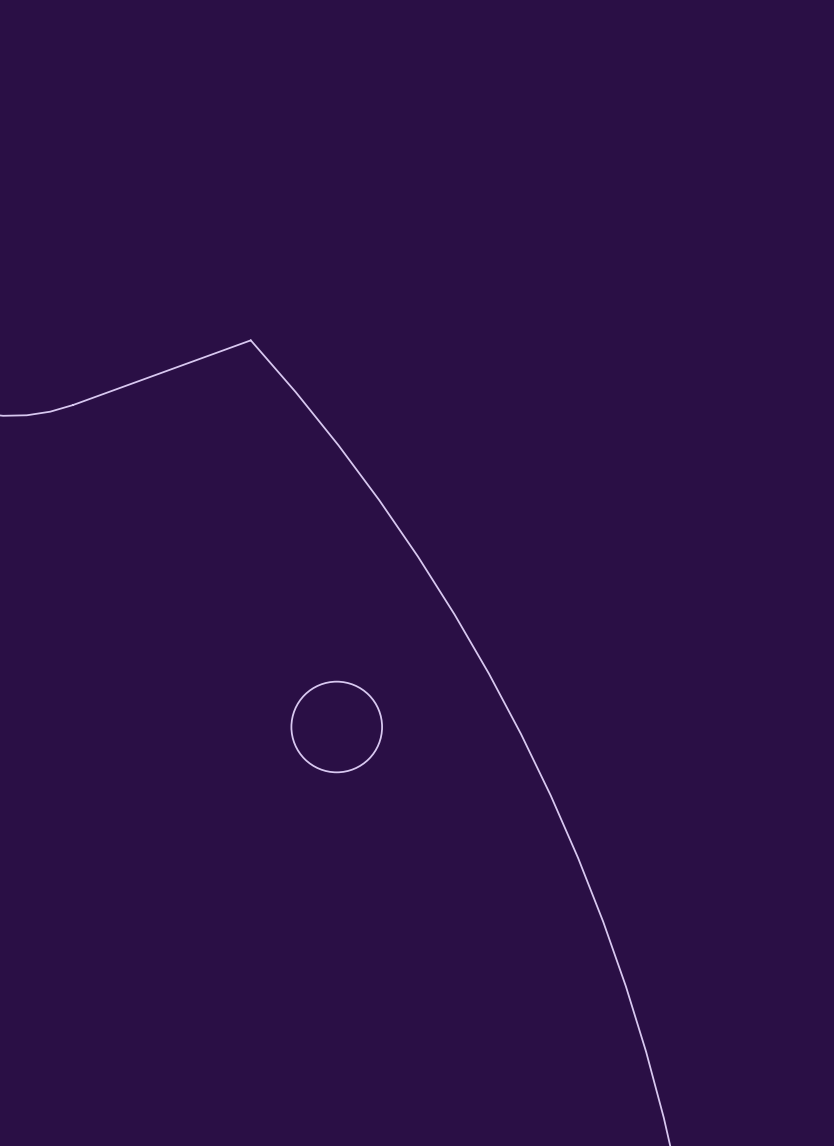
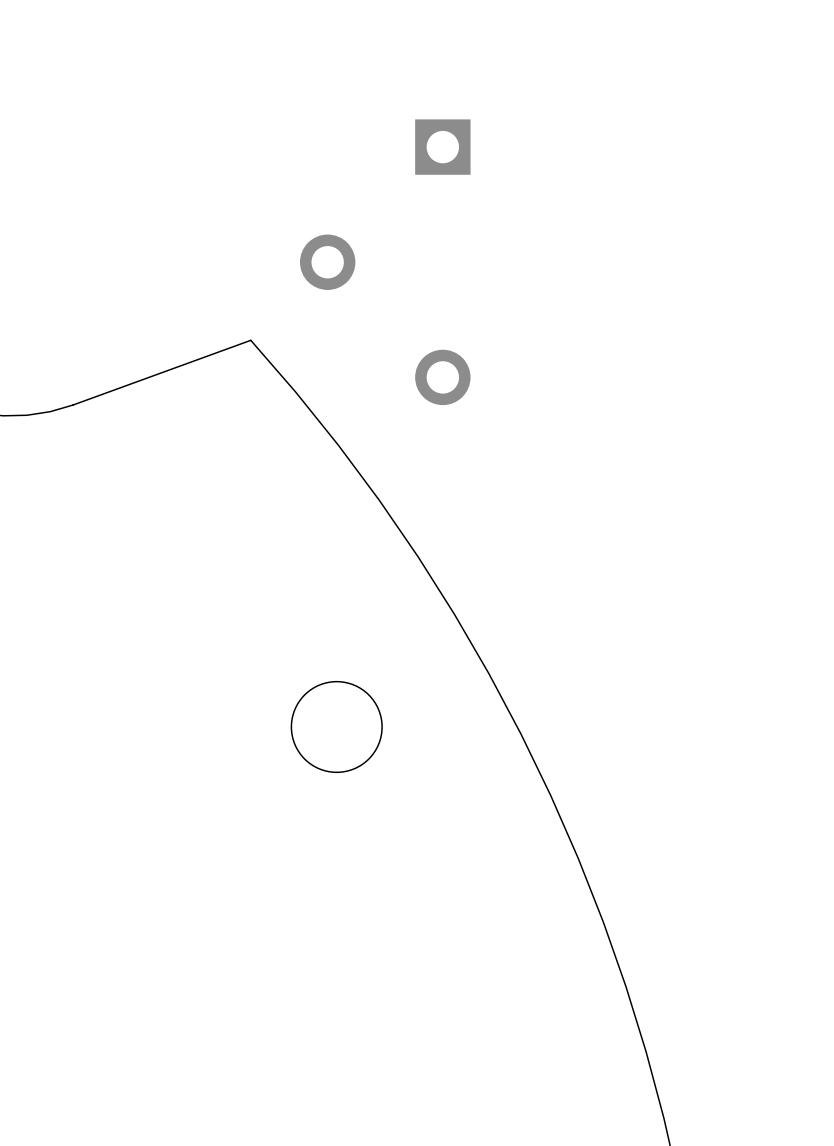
part: none -> (385, 262)

